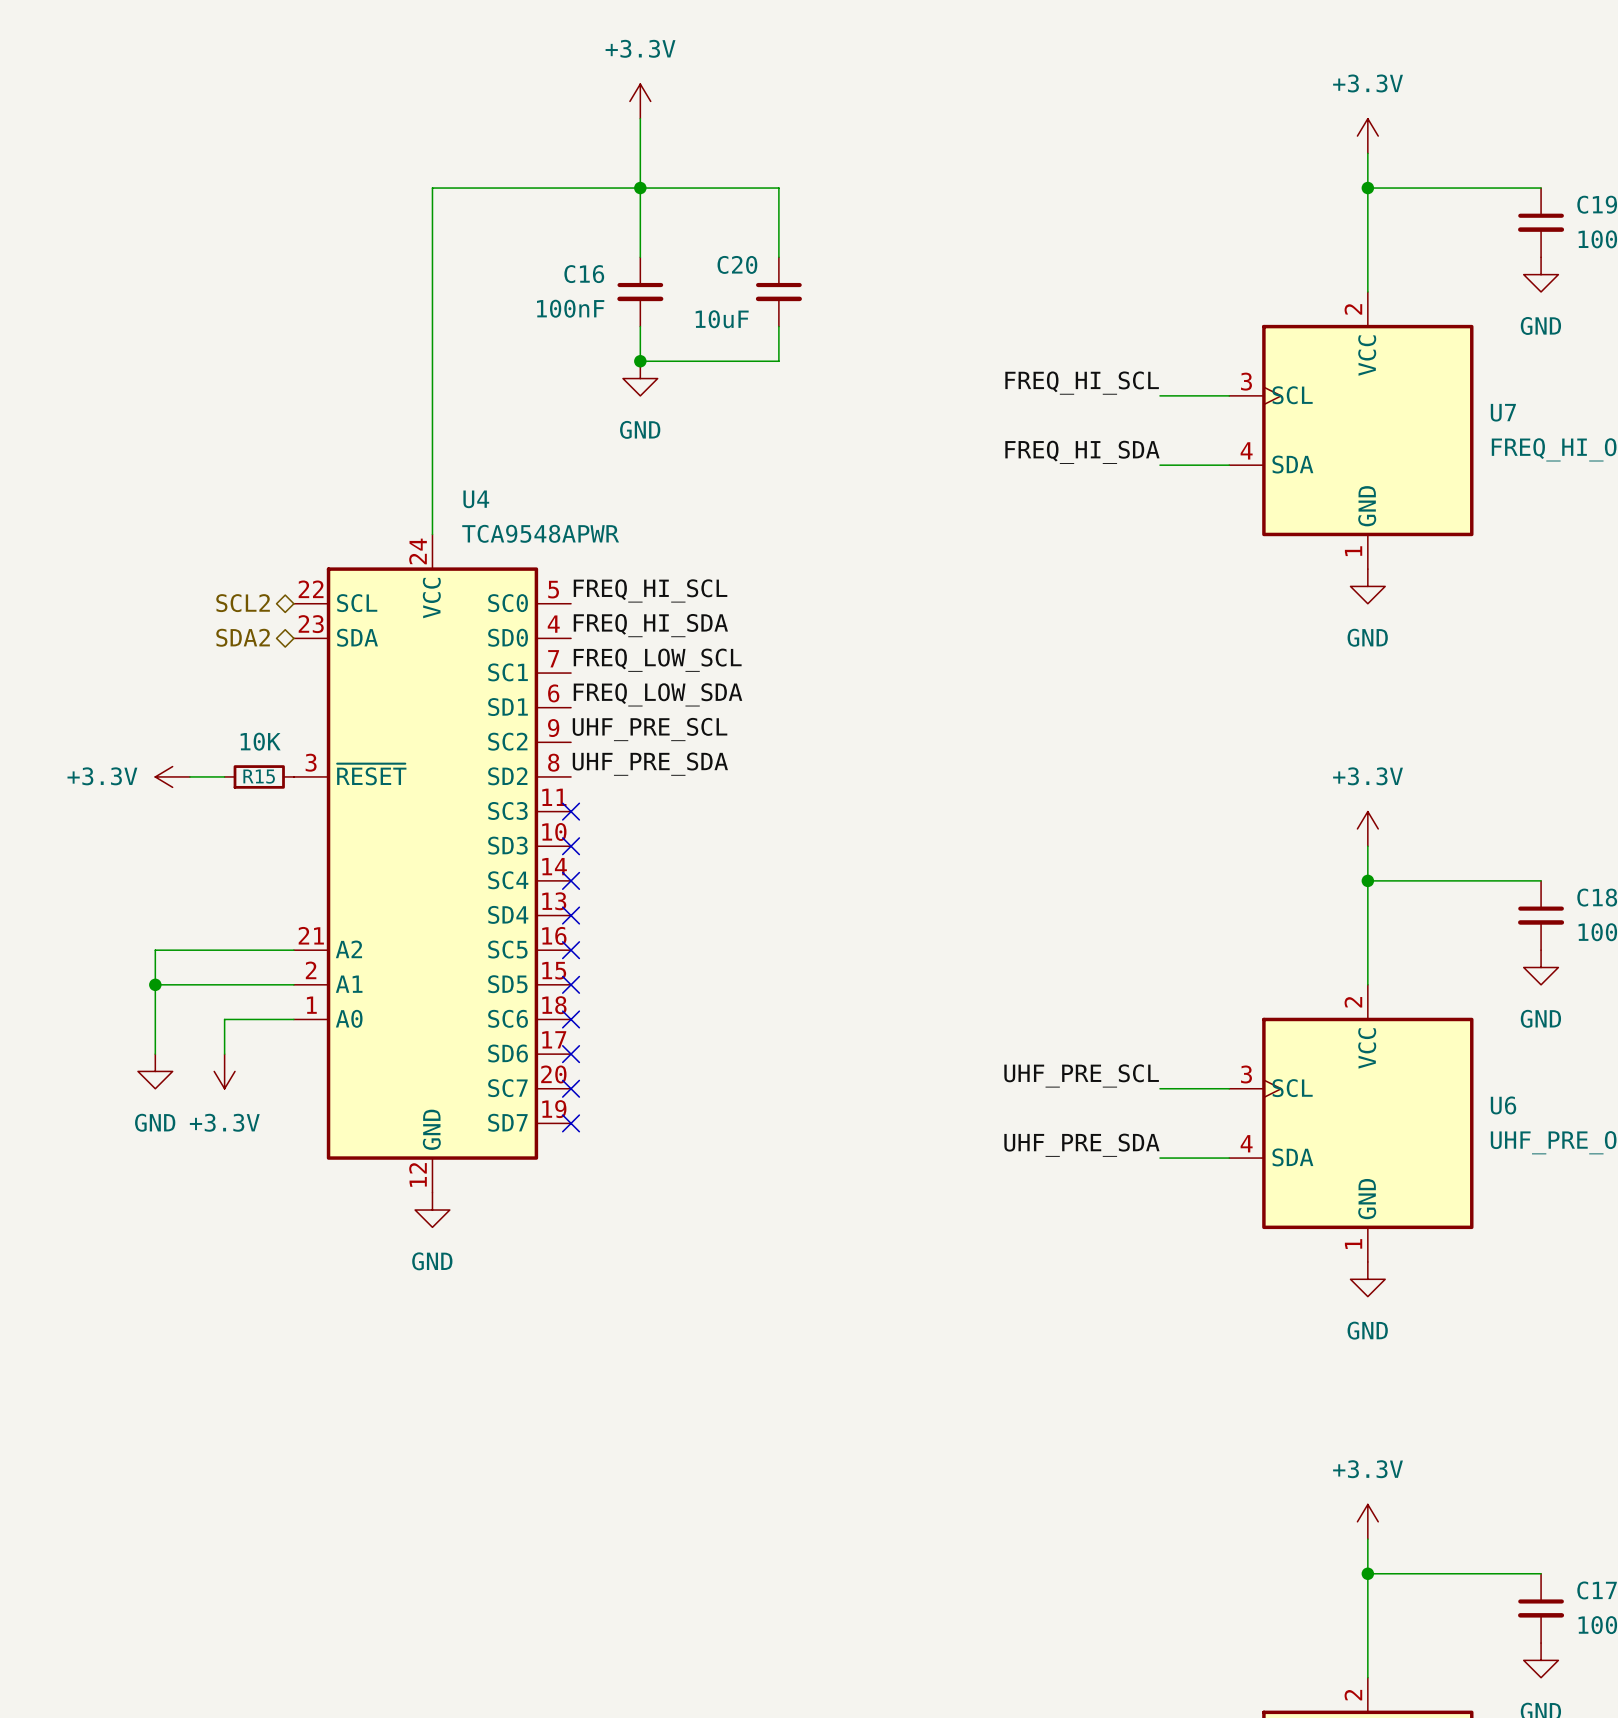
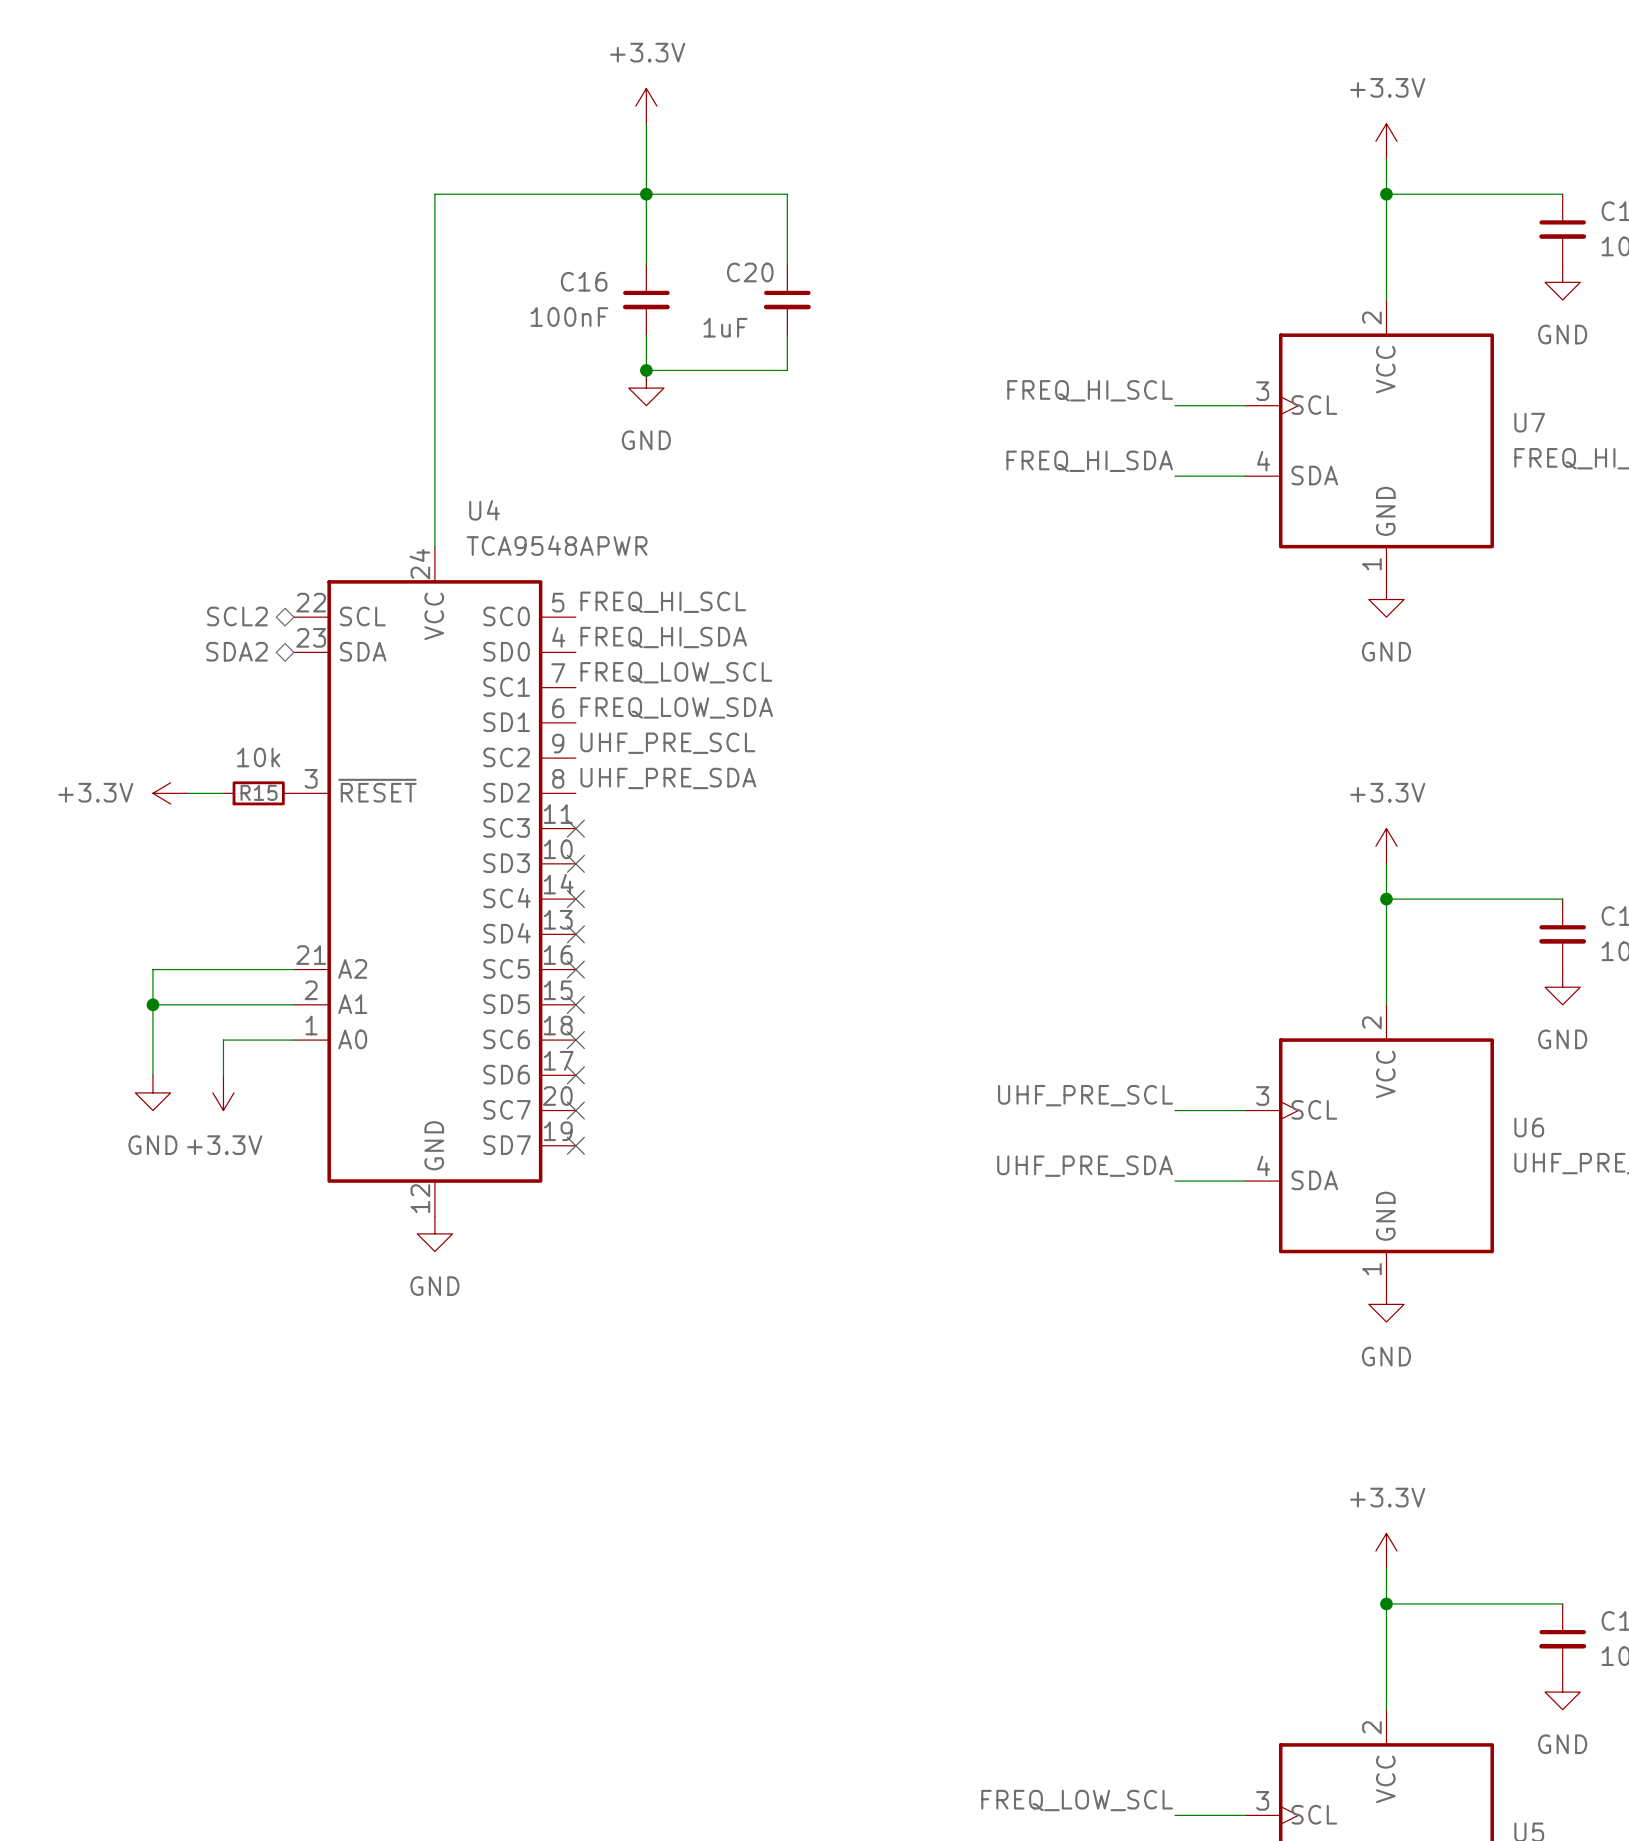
C20 value: 10uF (722, 319) -> 1uF (725, 327)
R15 value: 10K (260, 741) -> 10k (258, 757)

